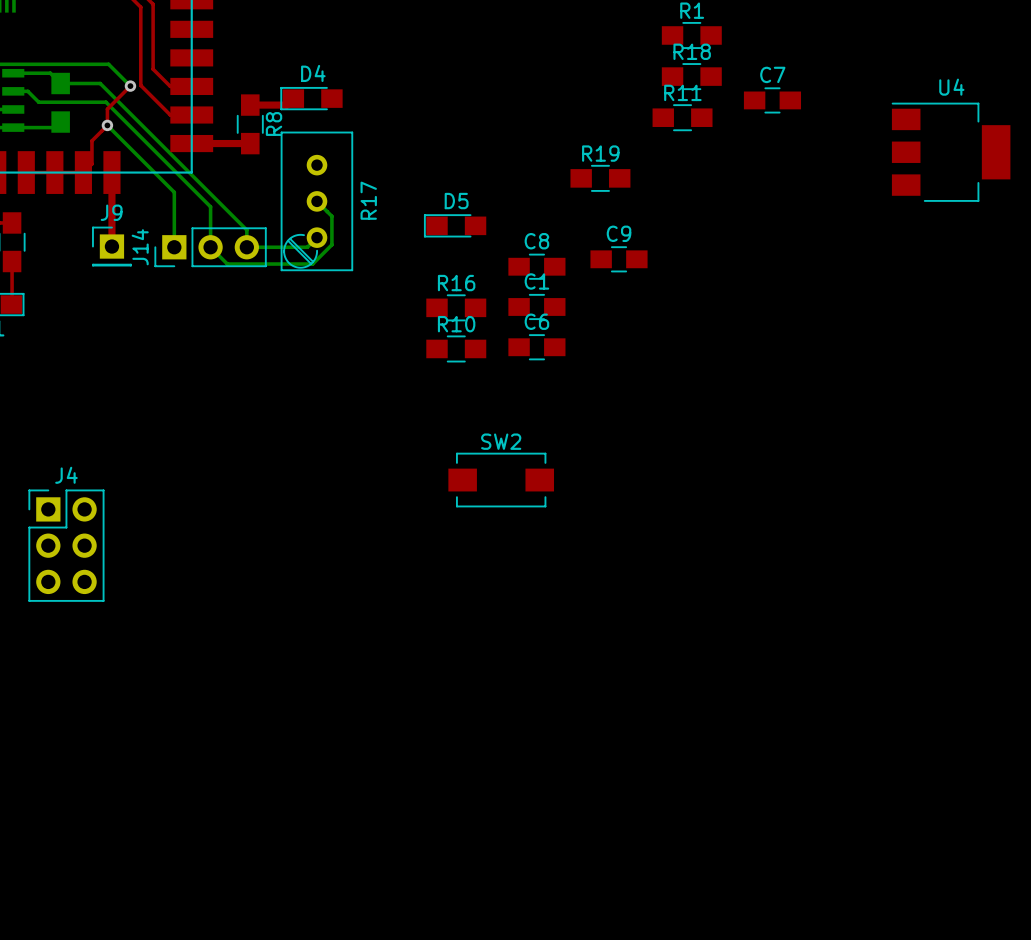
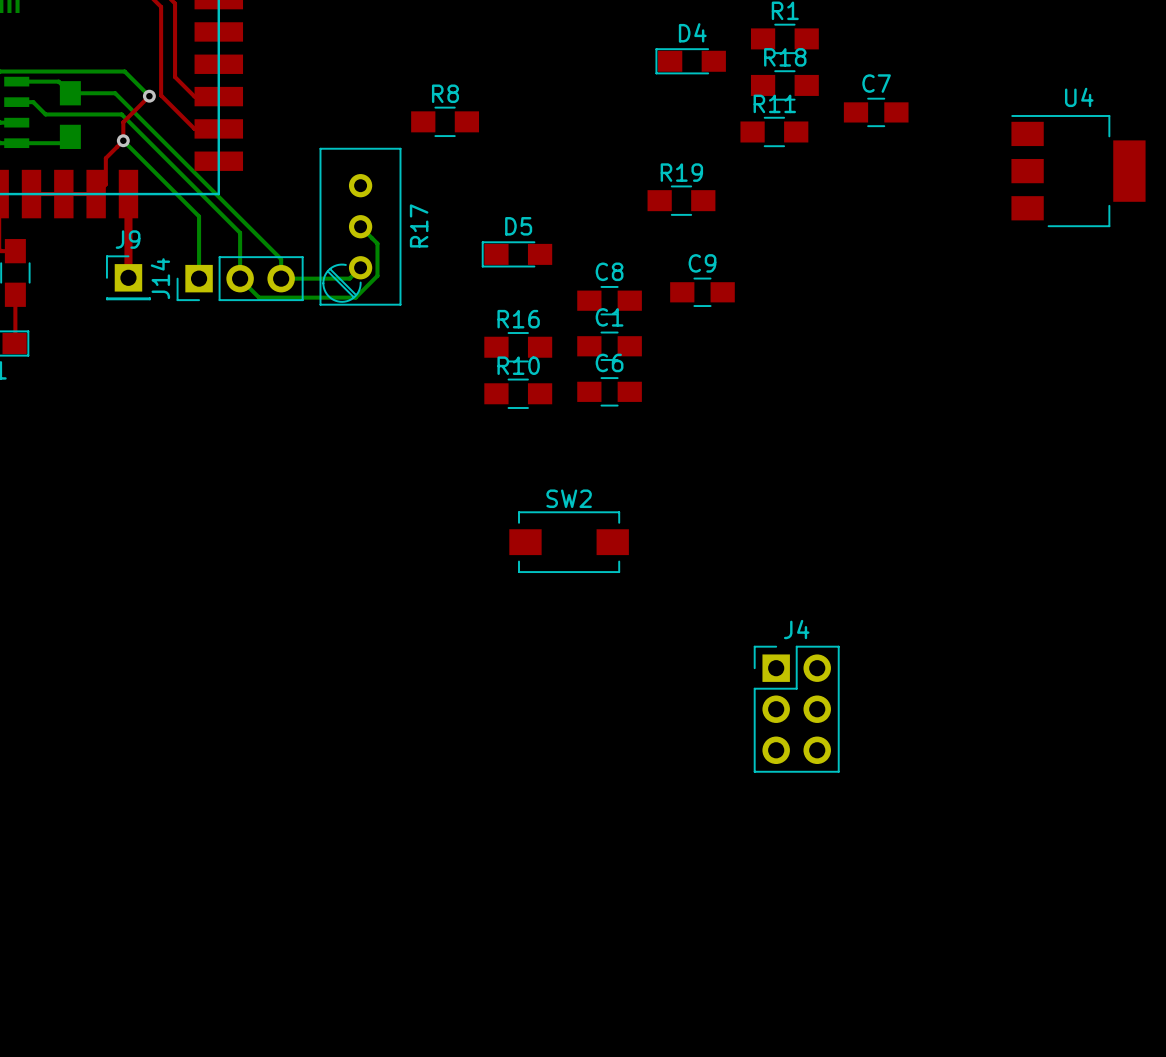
top track: (293, 98) (286, 105) (250, 105) -> none
D4 position: (311, 98) -> (690, 61)
R8 rotation: 0° (250, 124) -> 90° clockwise (445, 121)
R8 position: (250, 124) -> (445, 121)
R8 name position: R8 (274, 124) -> R8 (445, 93)
top track: (191, 143) (250, 143) -> none
J4 position: (66, 545) -> (796, 709)

